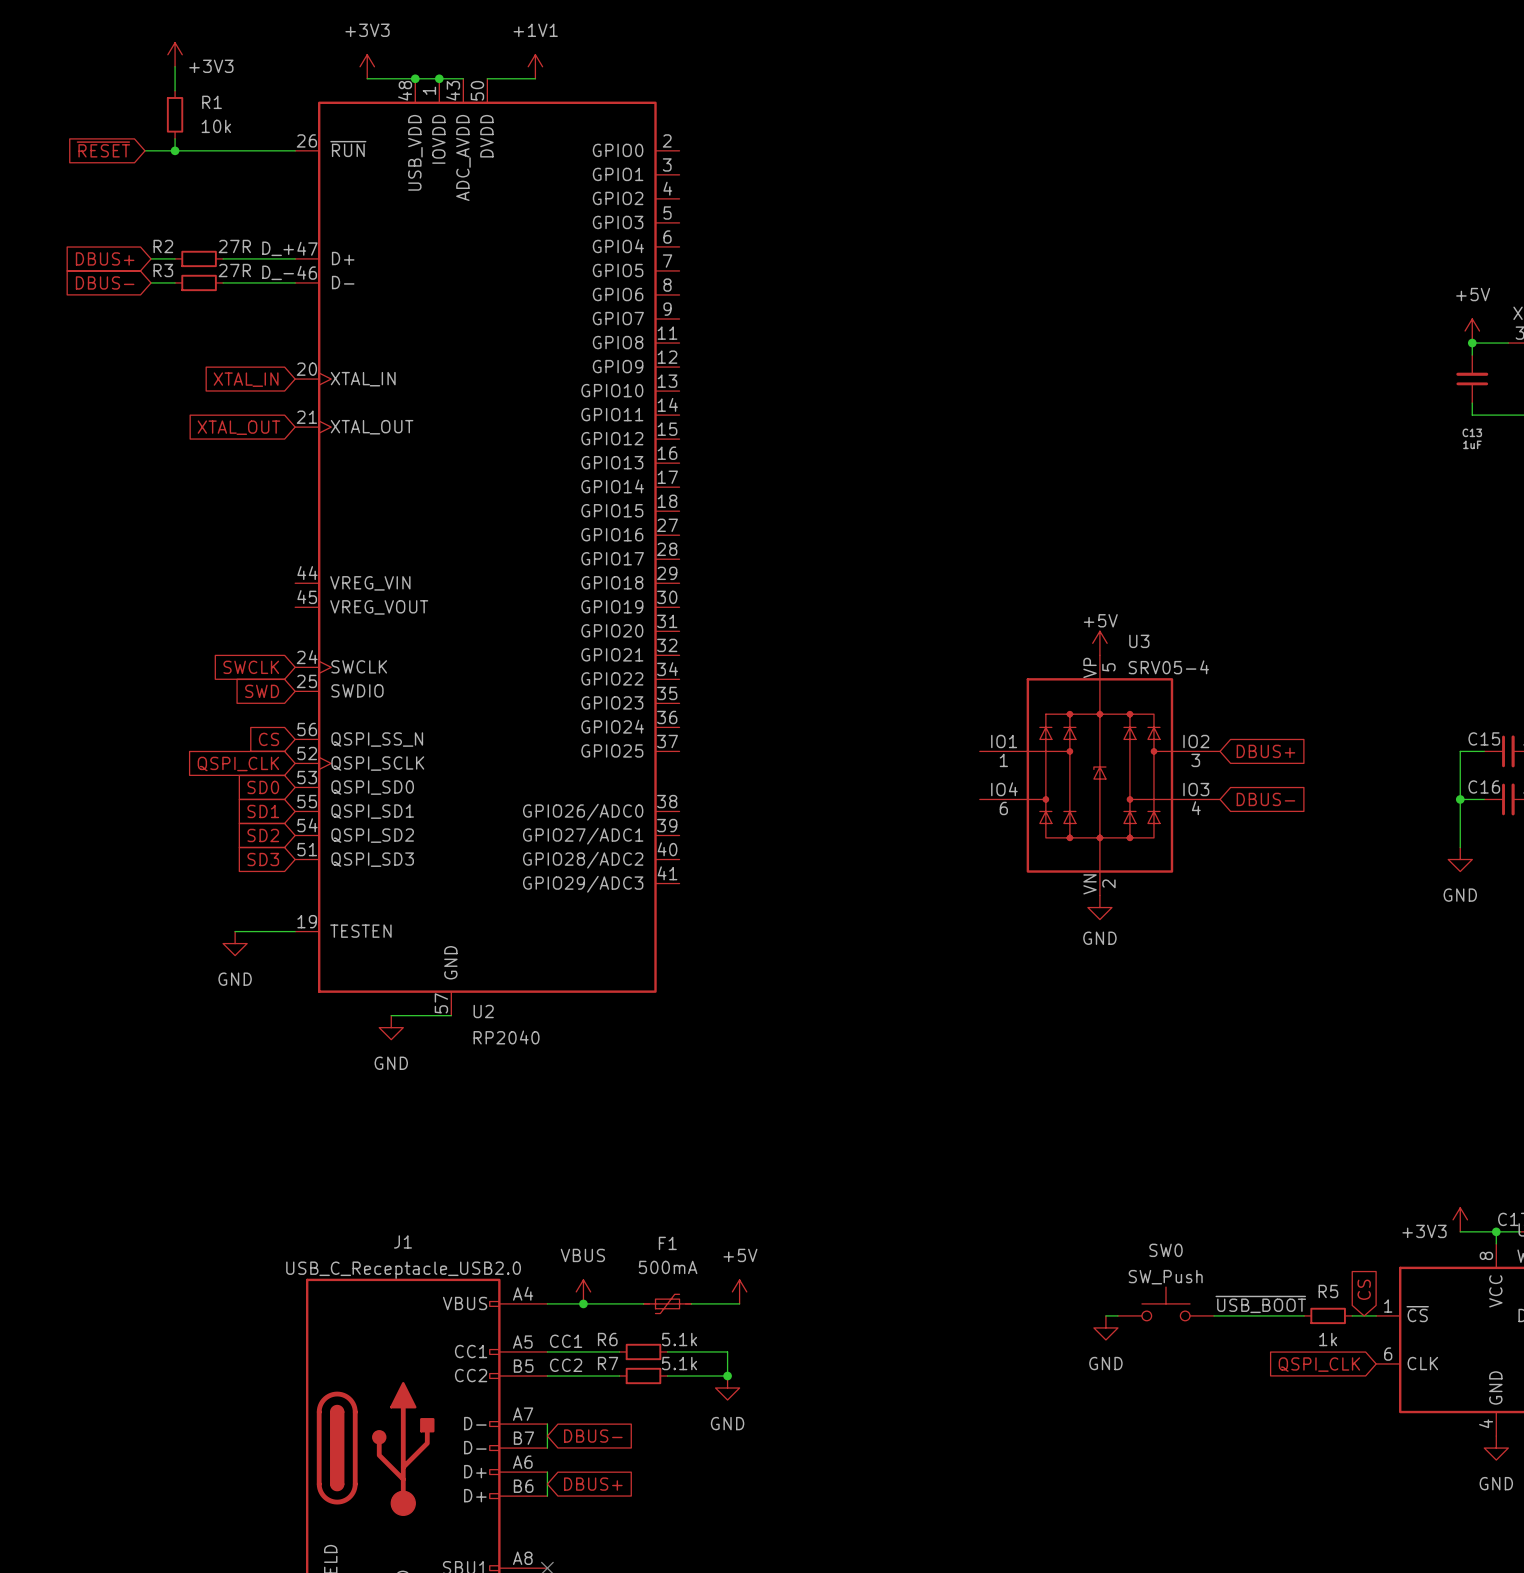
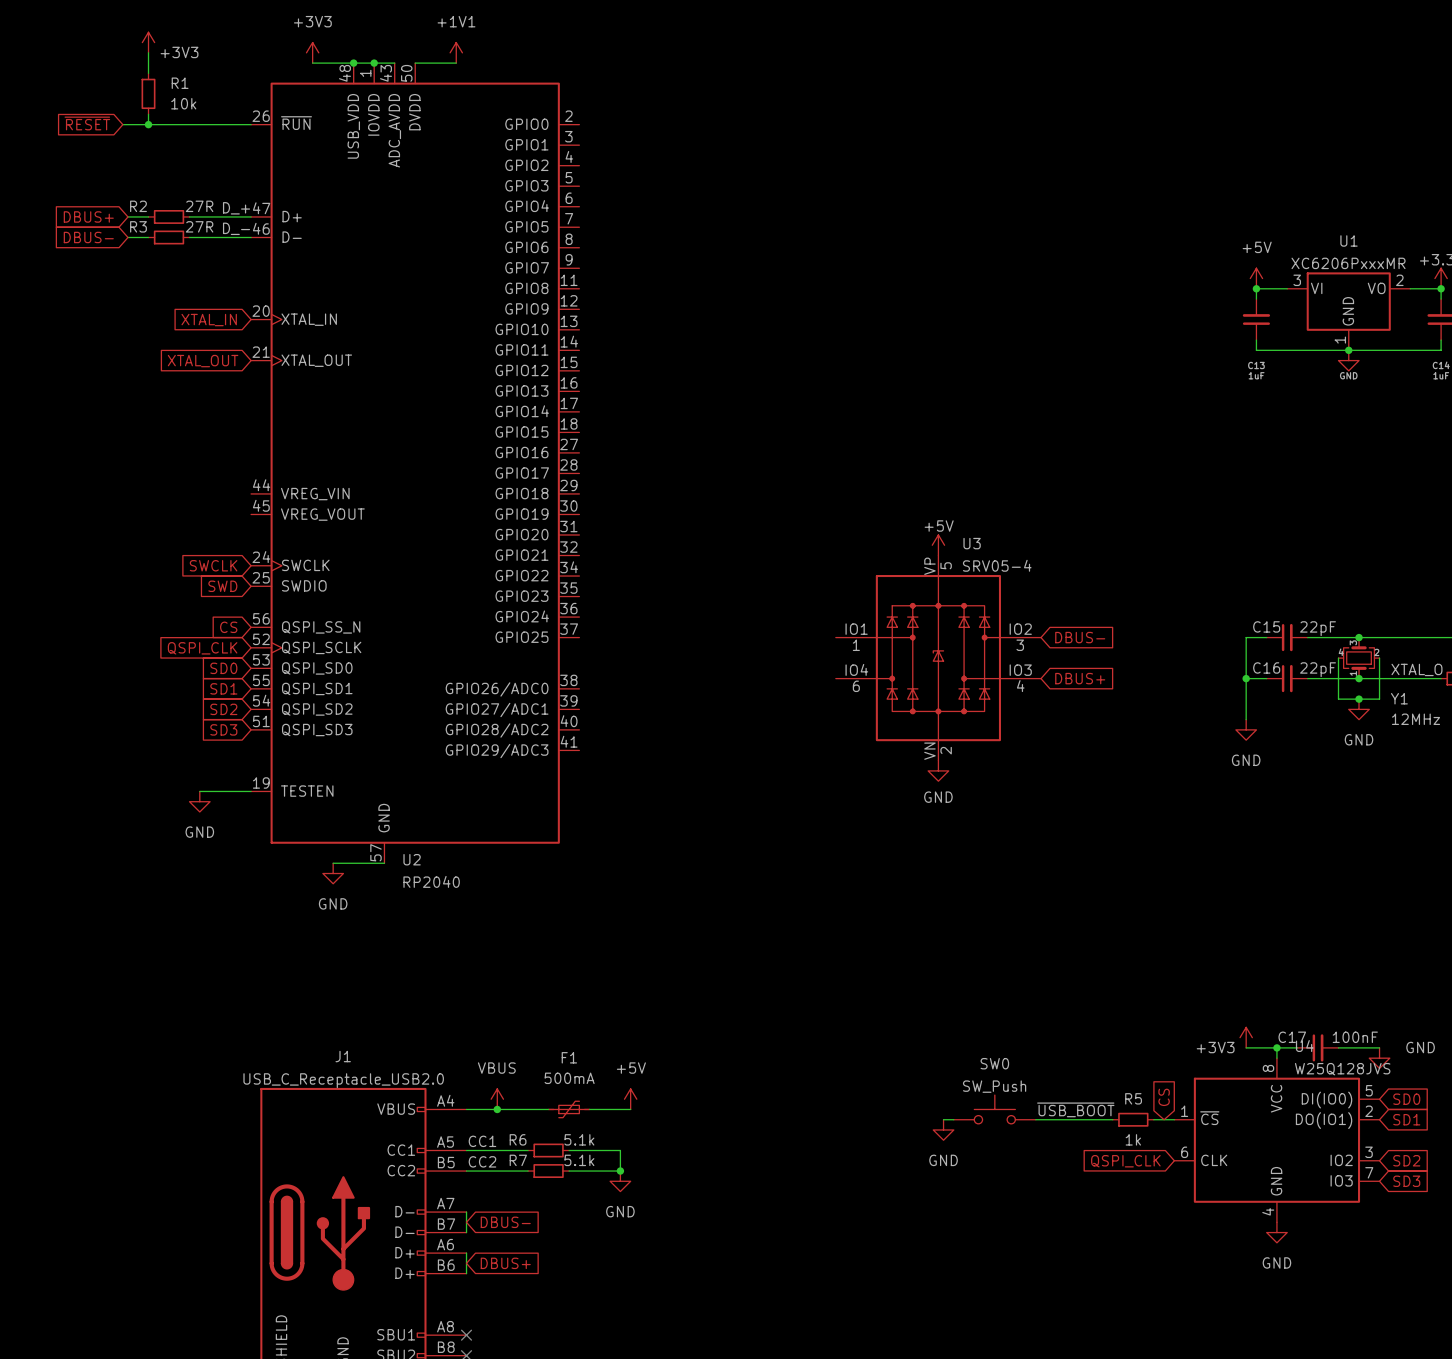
global label: DBUS+ (1265, 751) -> DBUS- (1080, 637)
global label: DBUS- (1265, 799) -> DBUS+ (1080, 678)

